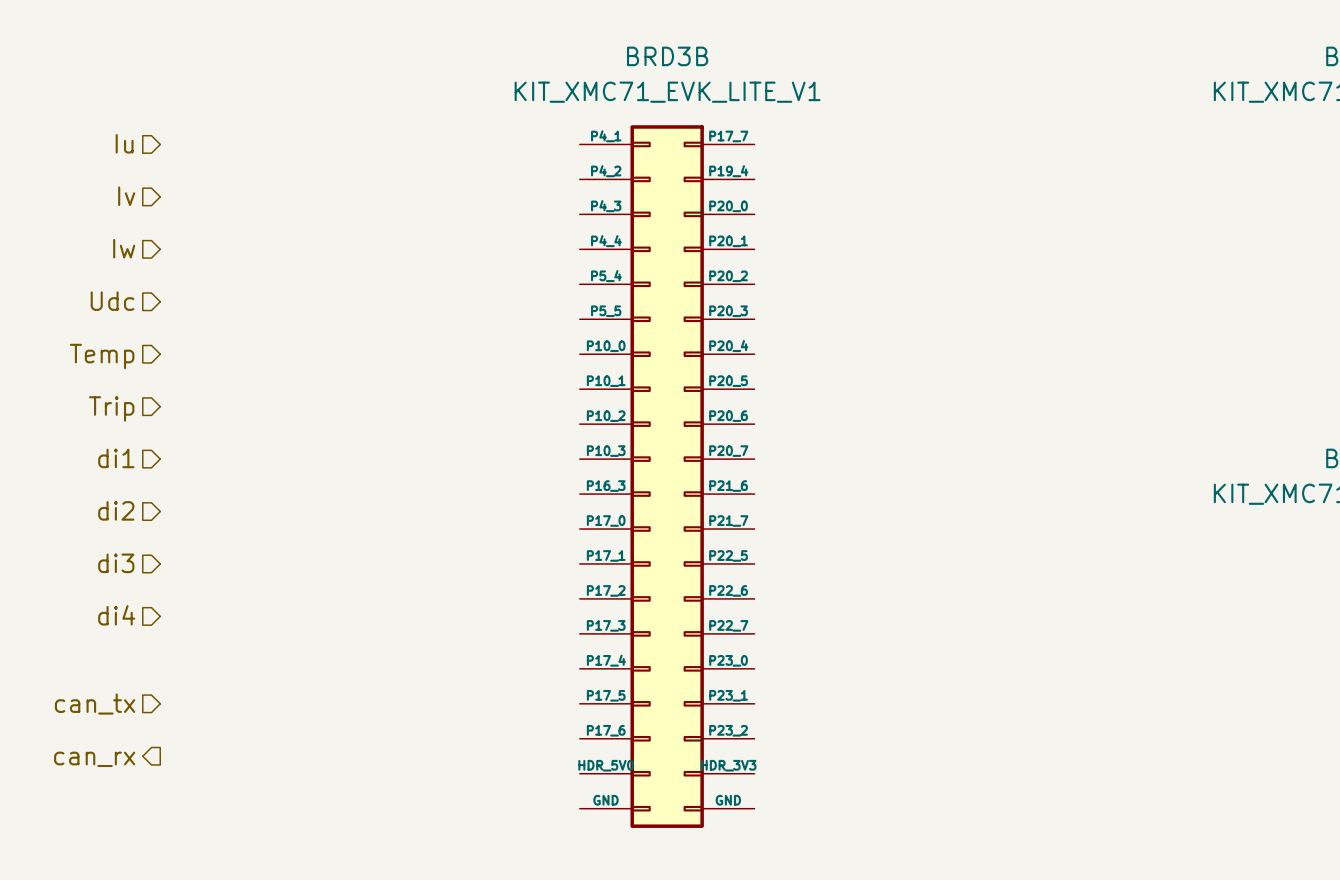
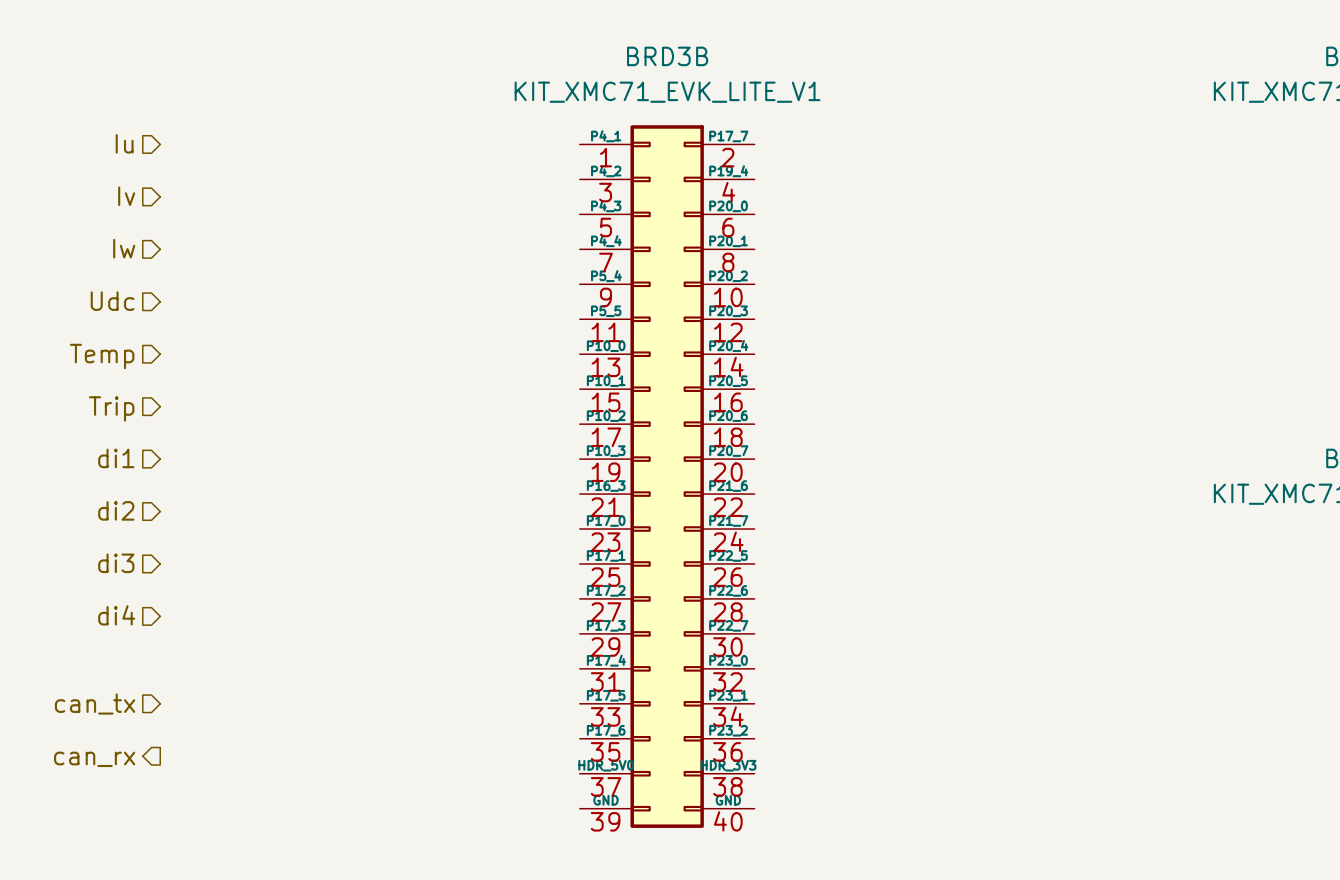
BRD3B symbol: [579, 125, 755, 828] -> [579, 125, 755, 828]

